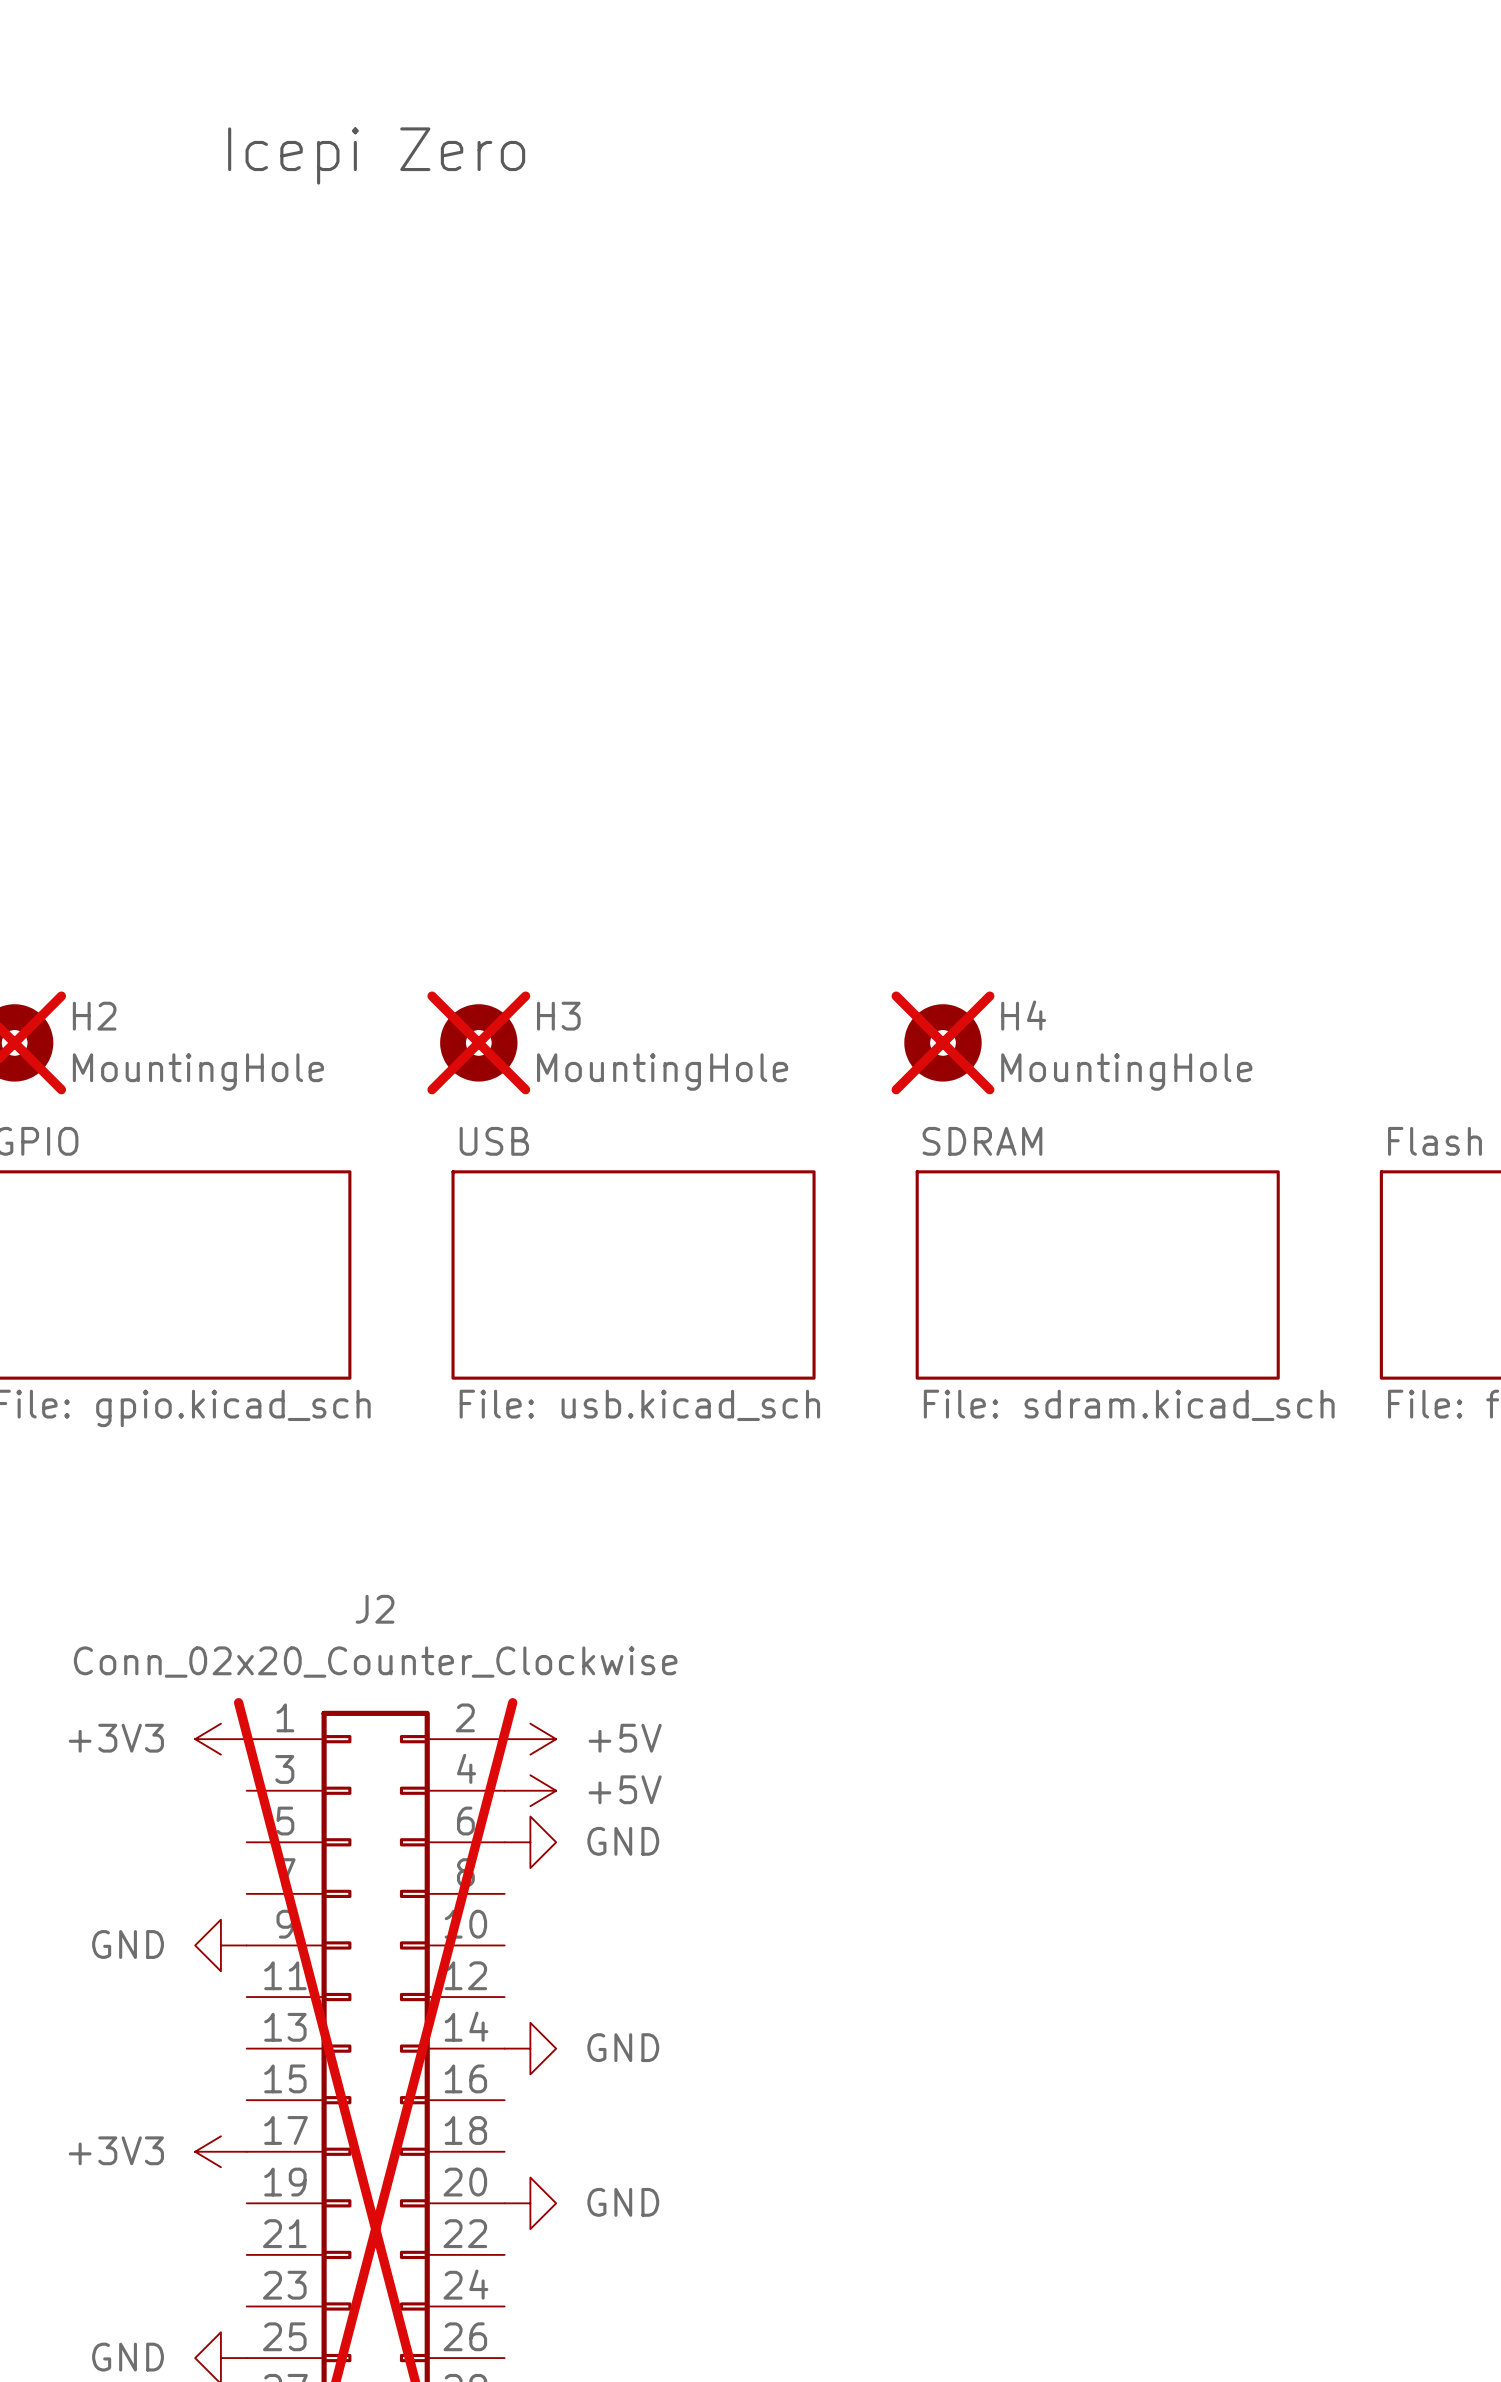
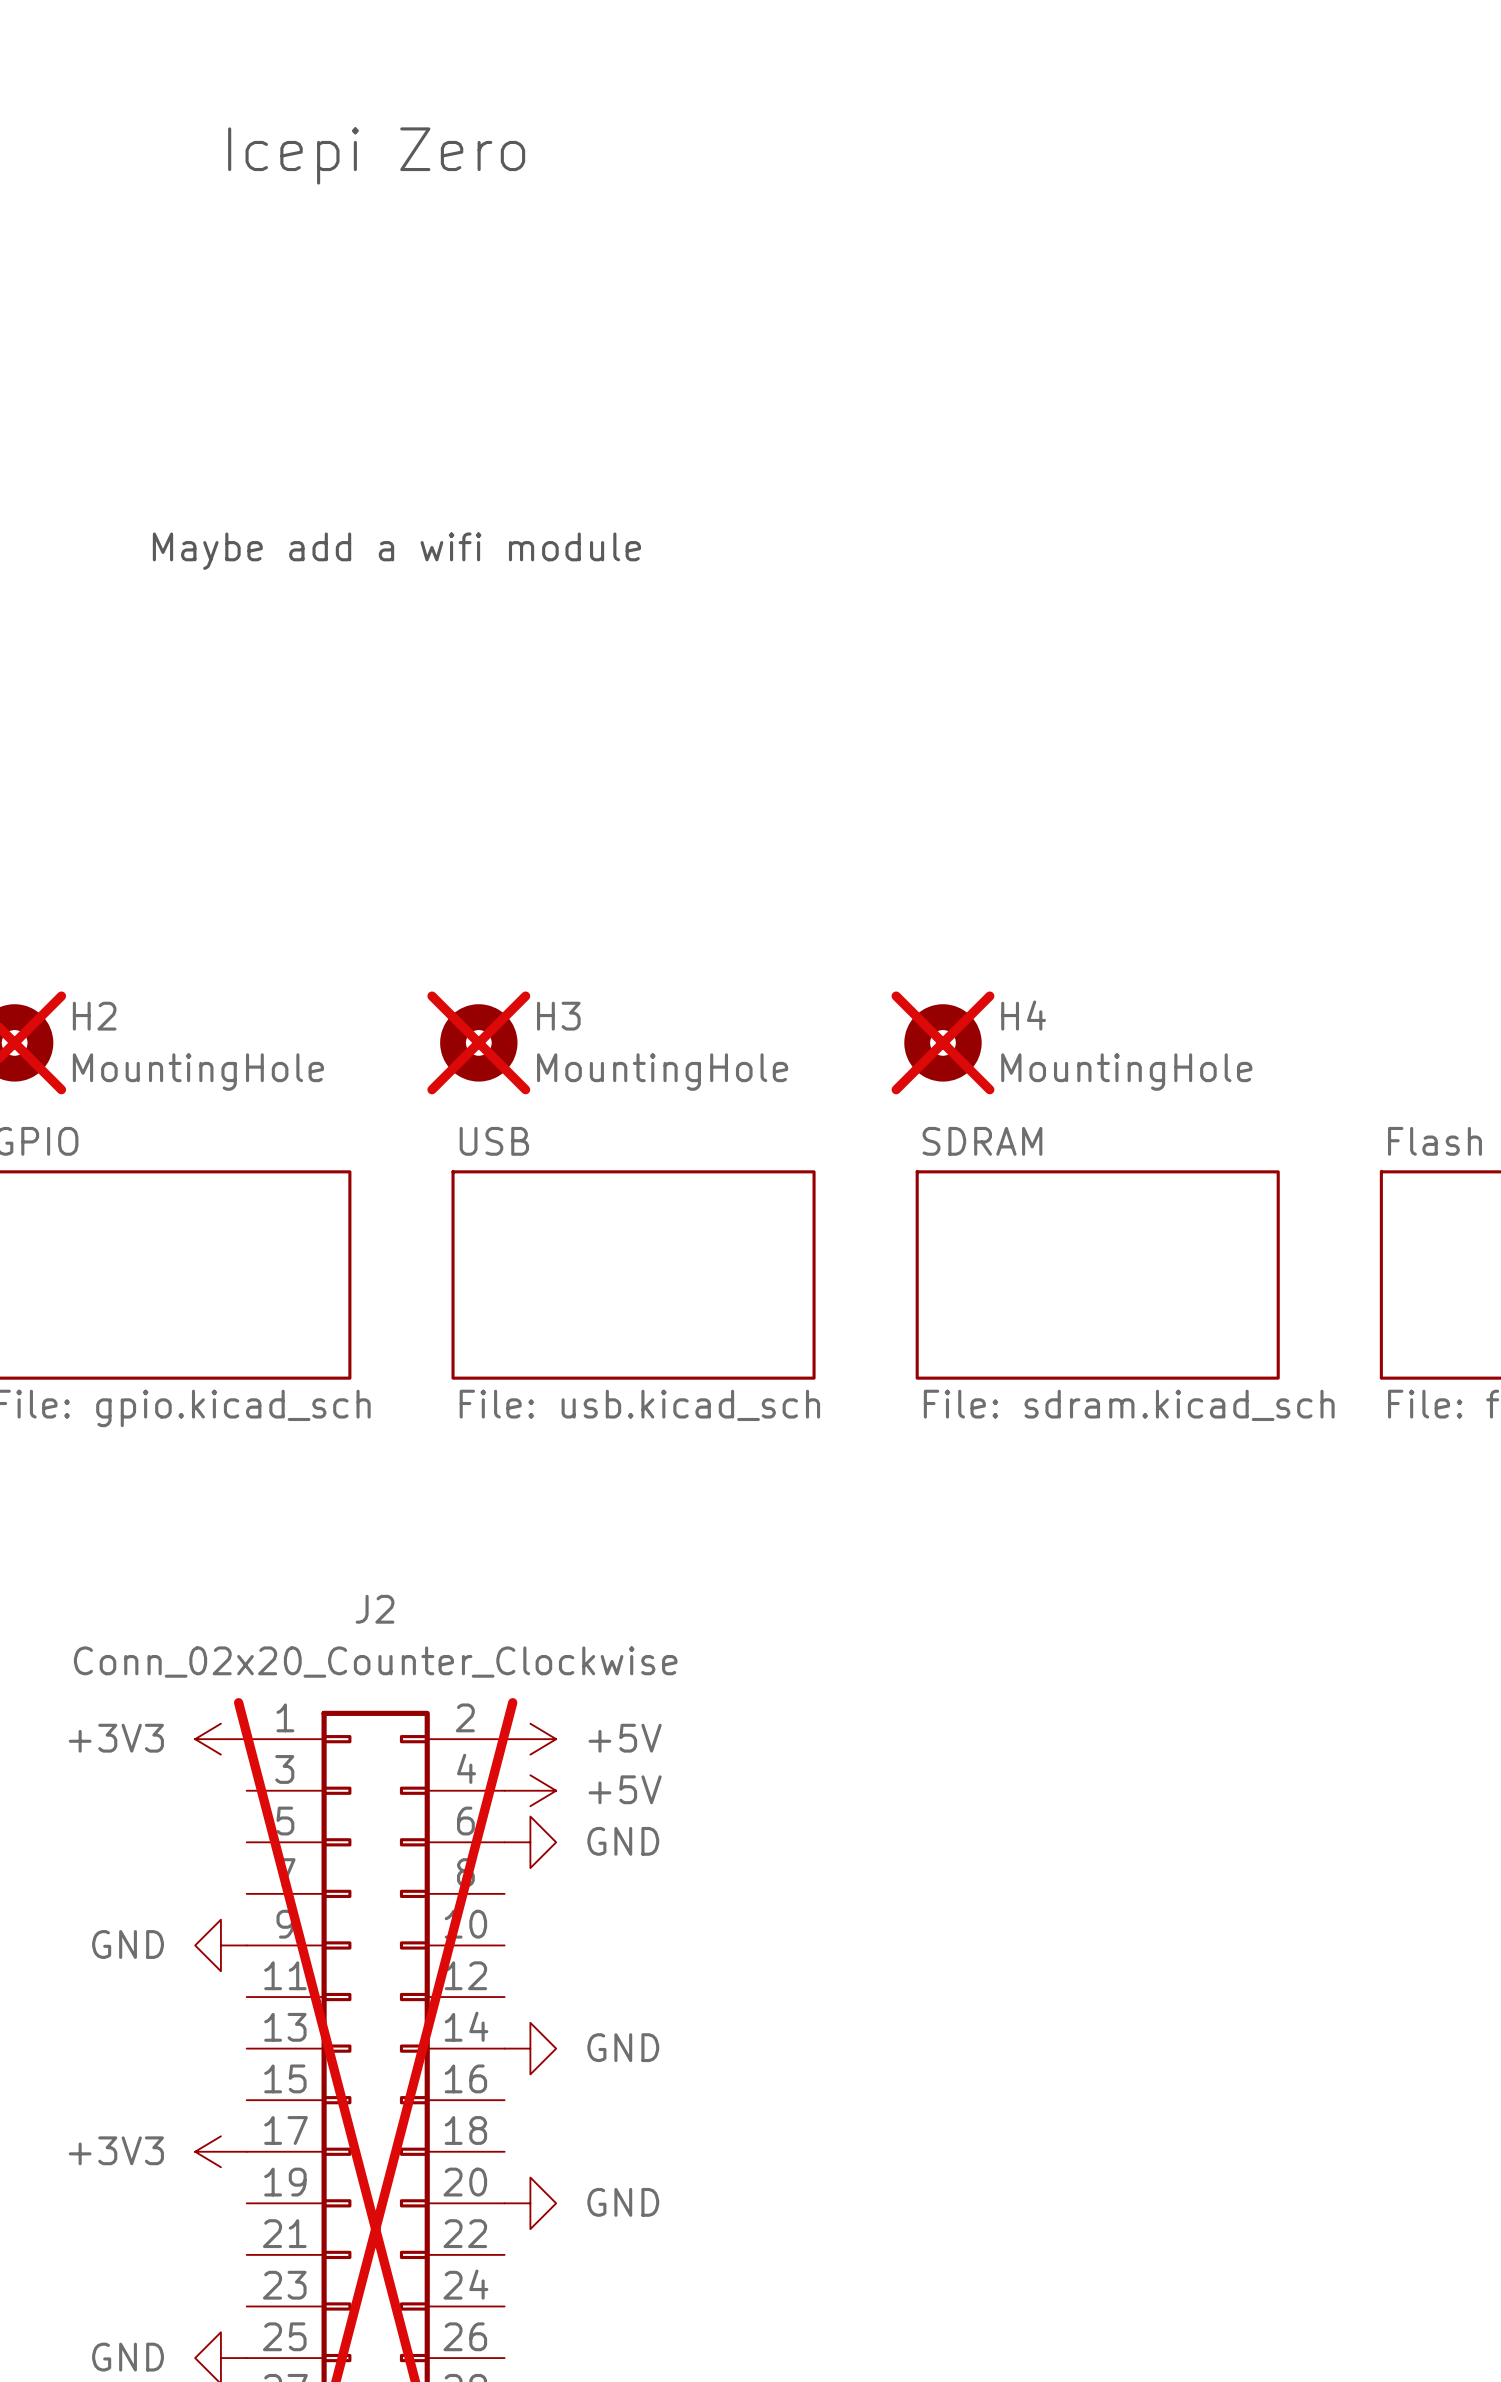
text: none -> Maybe add a wifi module (396, 551)

